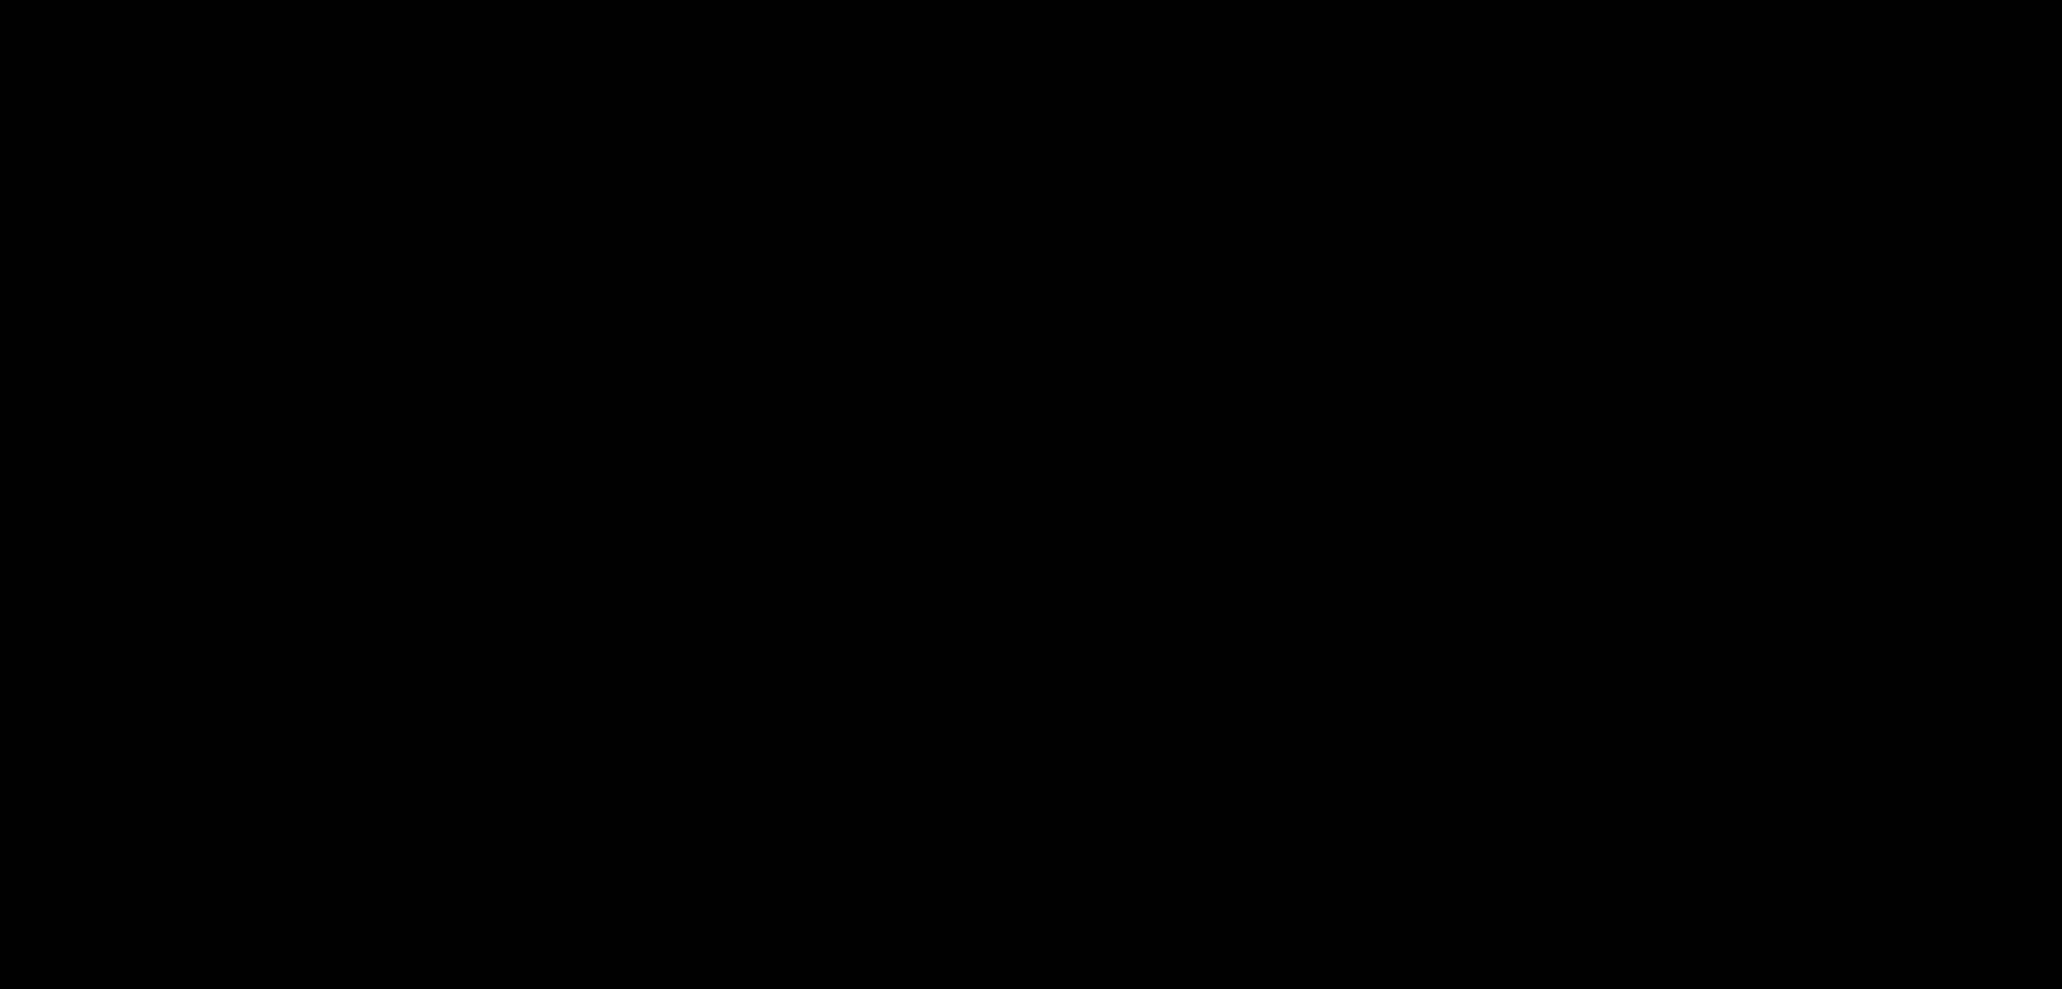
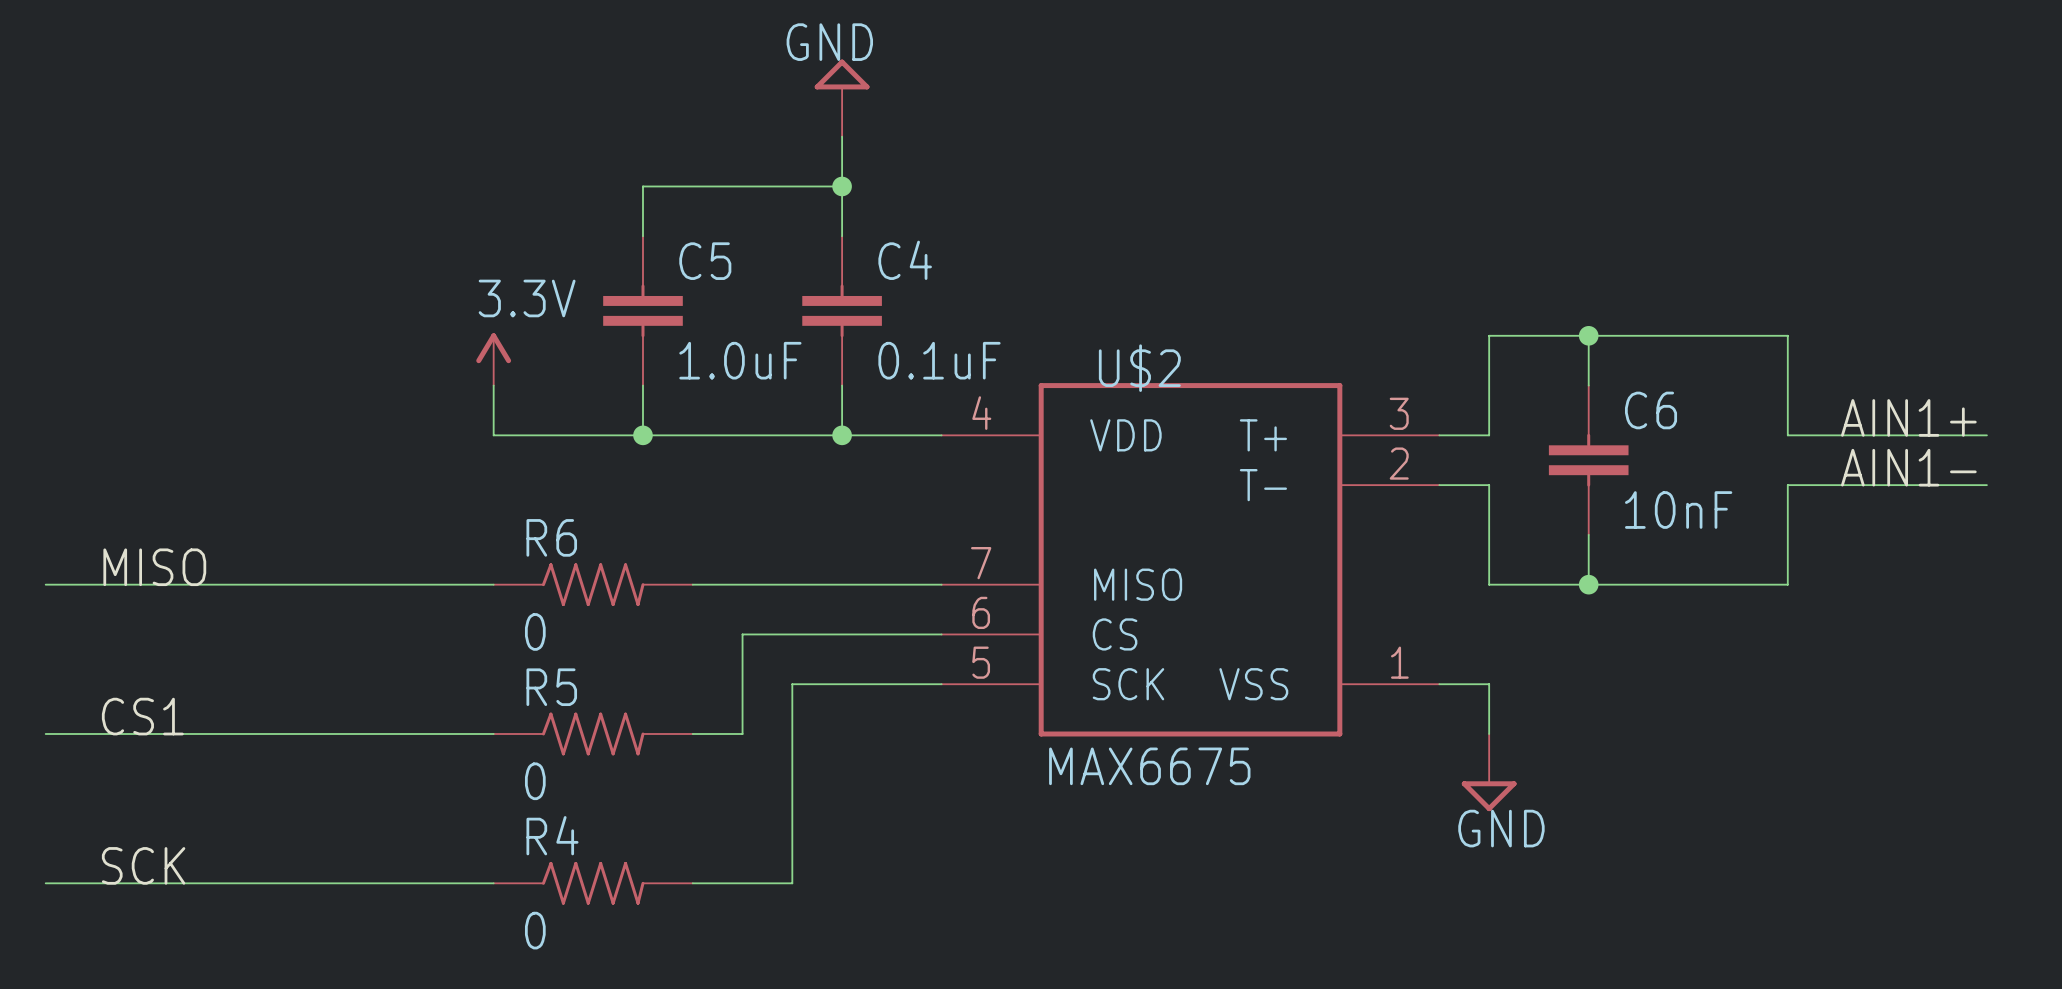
power symbol: none -> GND (842, 98)
wire: none -> (842, 136) (842, 236)
wire: none -> (842, 186) (642, 186) (642, 236)
junction: none -> (842, 186)
C5: none -> 1.0uF (642, 310)
C4: none -> 0.1uF (842, 310)
wire: none -> (1588, 335) (1588, 385)
junction: none -> (1588, 335)
power symbol: none -> 3.3V (493, 359)
wire: none -> (493, 385) (493, 435) (941, 435)
wire: none -> (642, 385) (642, 435)
wire: none -> (842, 385) (842, 435)
label: none -> AIN1+ (1908, 417)
junction: none -> (642, 435)
junction: none -> (842, 435)
wire: none -> (1439, 435) (1489, 435) (1489, 335) (1787, 335) (1787, 435) (1986, 435)
C6: none -> 10nF (1588, 460)
label: none -> AIN1- (1908, 467)
wire: none -> (1439, 485) (1489, 485) (1489, 584) (1787, 584) (1787, 485) (1986, 485)
wire: none -> (1588, 534) (1588, 584)
U$2: none -> MAX6675 (1190, 559)
label: none -> MISO (154, 567)
wire: none -> (45, 584) (493, 584)
R6: none -> 0 (593, 584)
wire: none -> (692, 584) (941, 584)
junction: none -> (1588, 584)
wire: none -> (941, 634) (742, 634) (742, 733) (692, 733)
wire: none -> (941, 684) (792, 684) (792, 883) (692, 883)
wire: none -> (1439, 684) (1489, 684) (1489, 733)
label: none -> CS1 (142, 716)
wire: none -> (45, 733) (493, 733)
R5: none -> 0 (593, 733)
power symbol: none -> GND (1489, 772)
label: none -> SCK (143, 865)
wire: none -> (45, 883) (493, 883)
R4: none -> 0 (593, 883)

